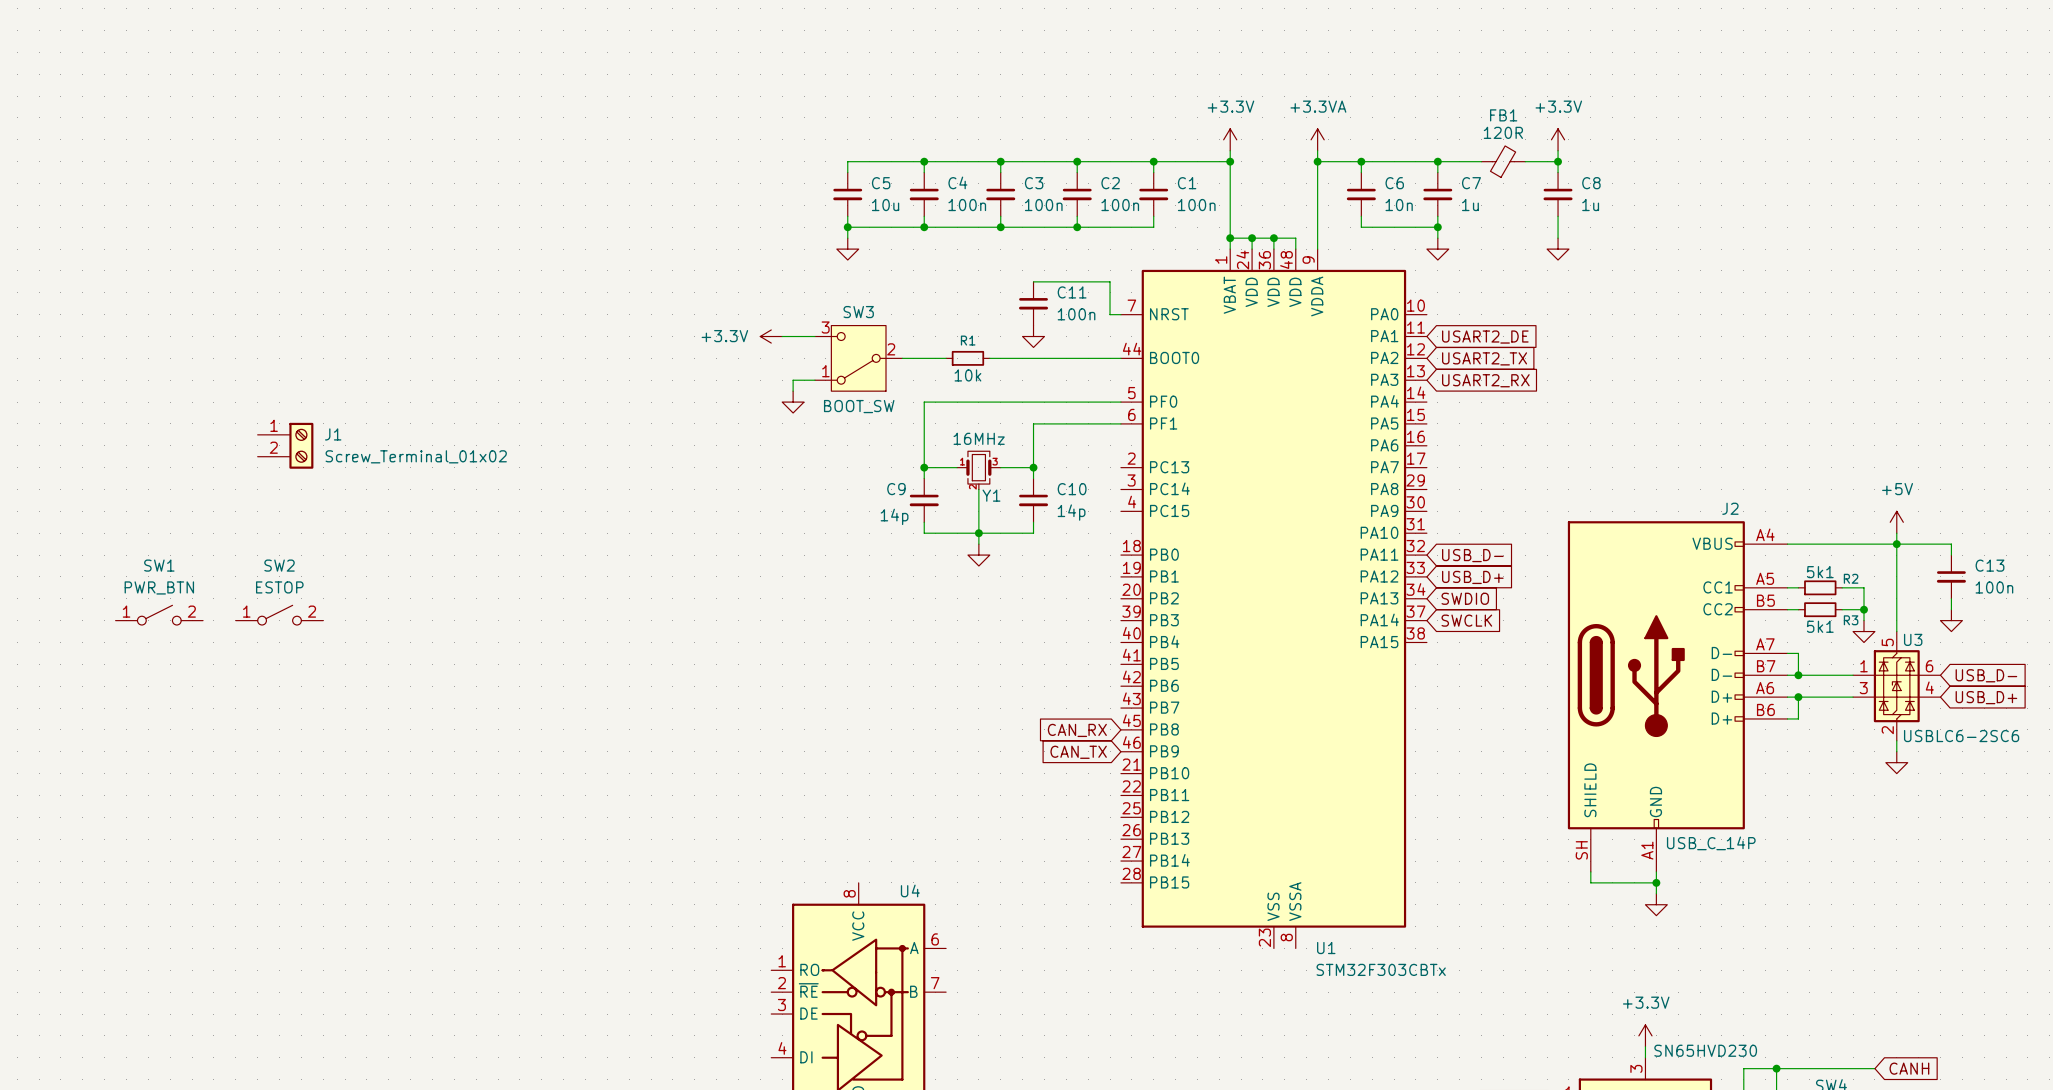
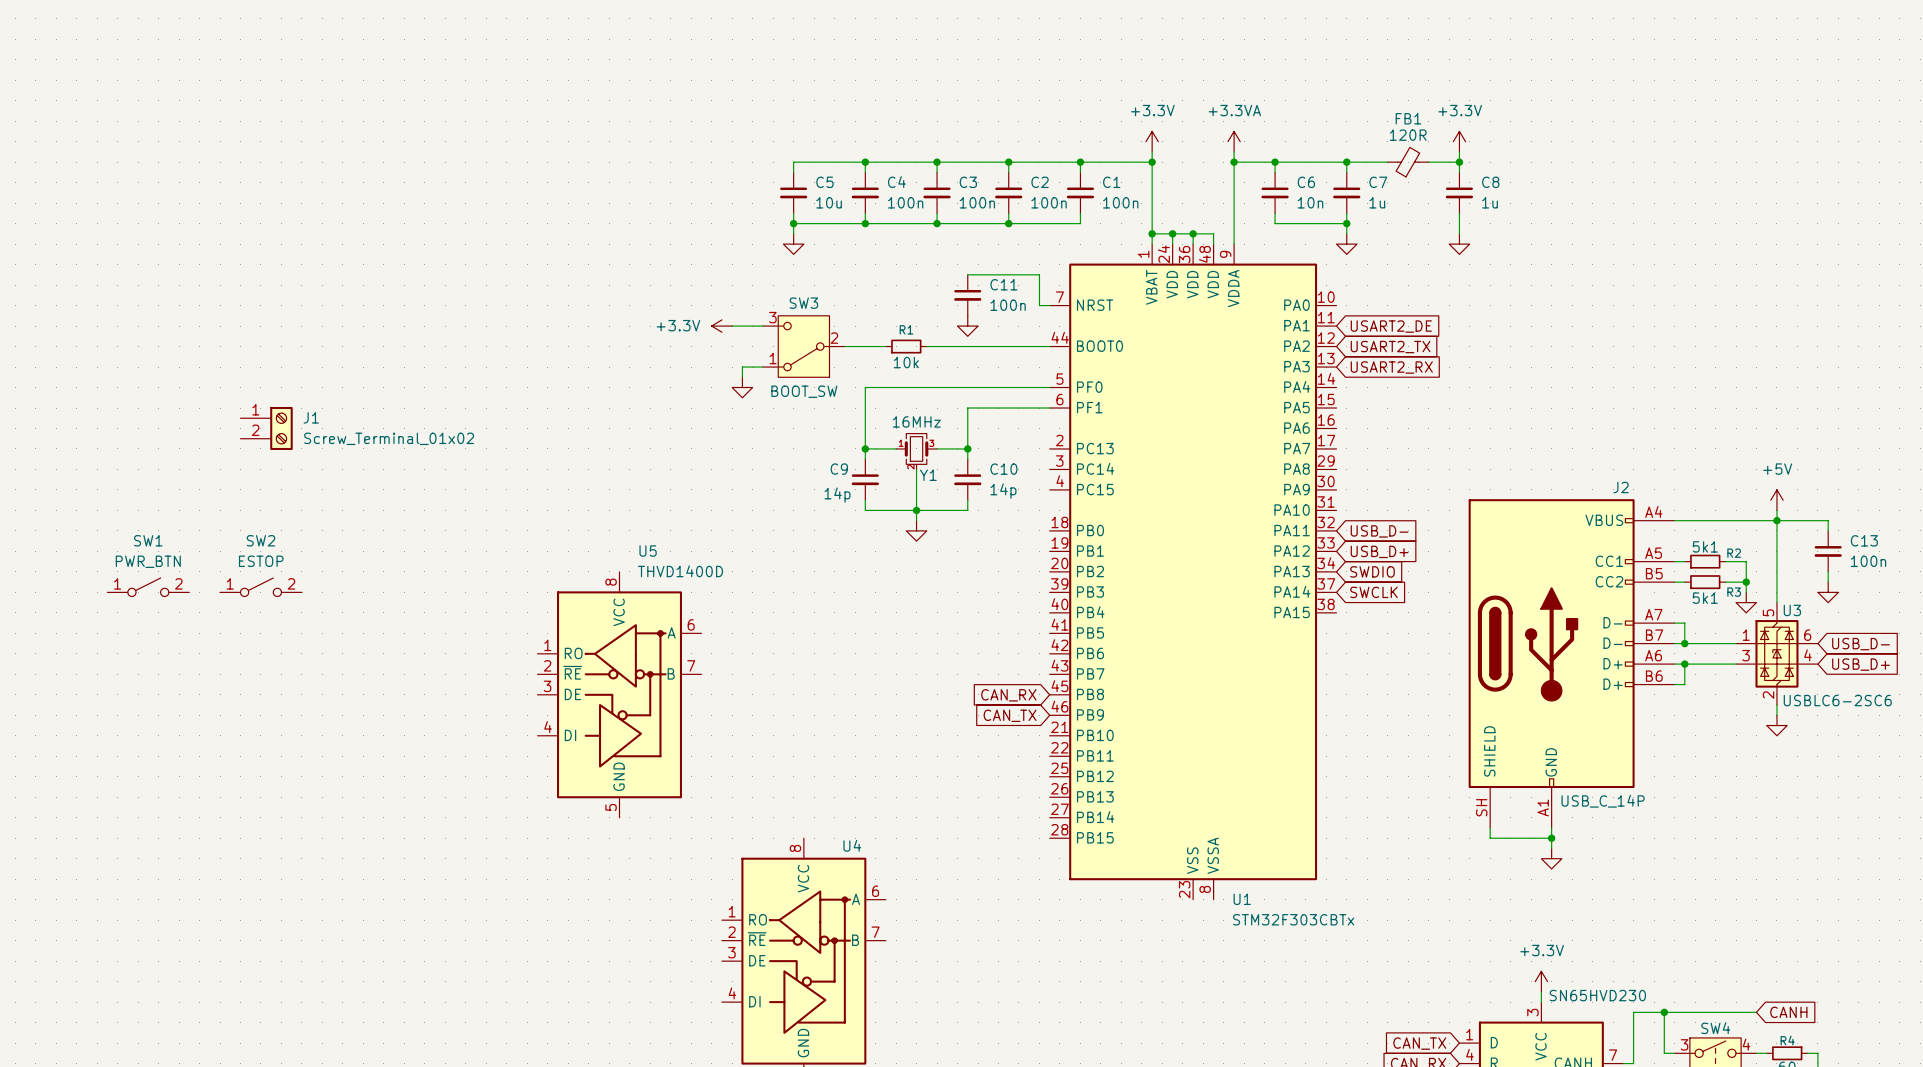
U5: none -> THVD1400D (619, 694)

